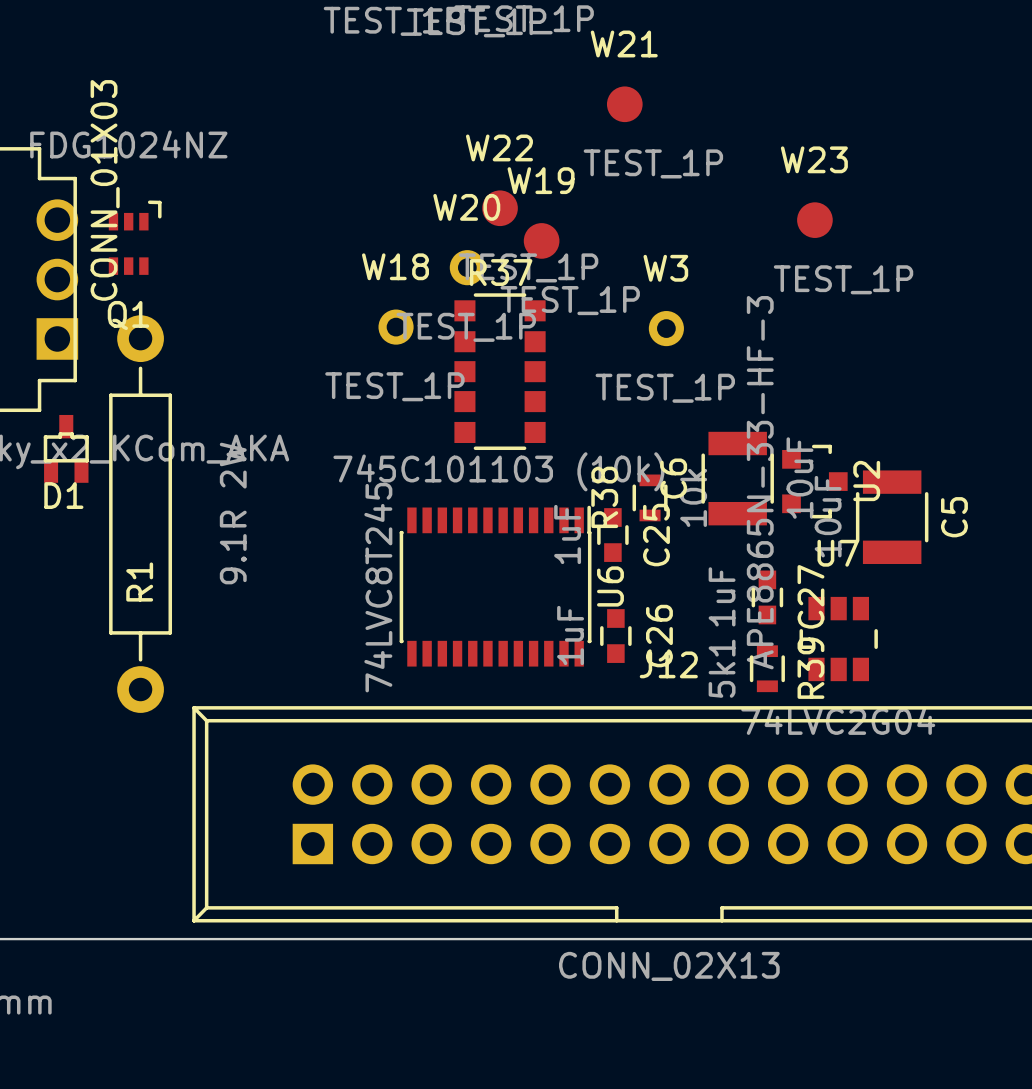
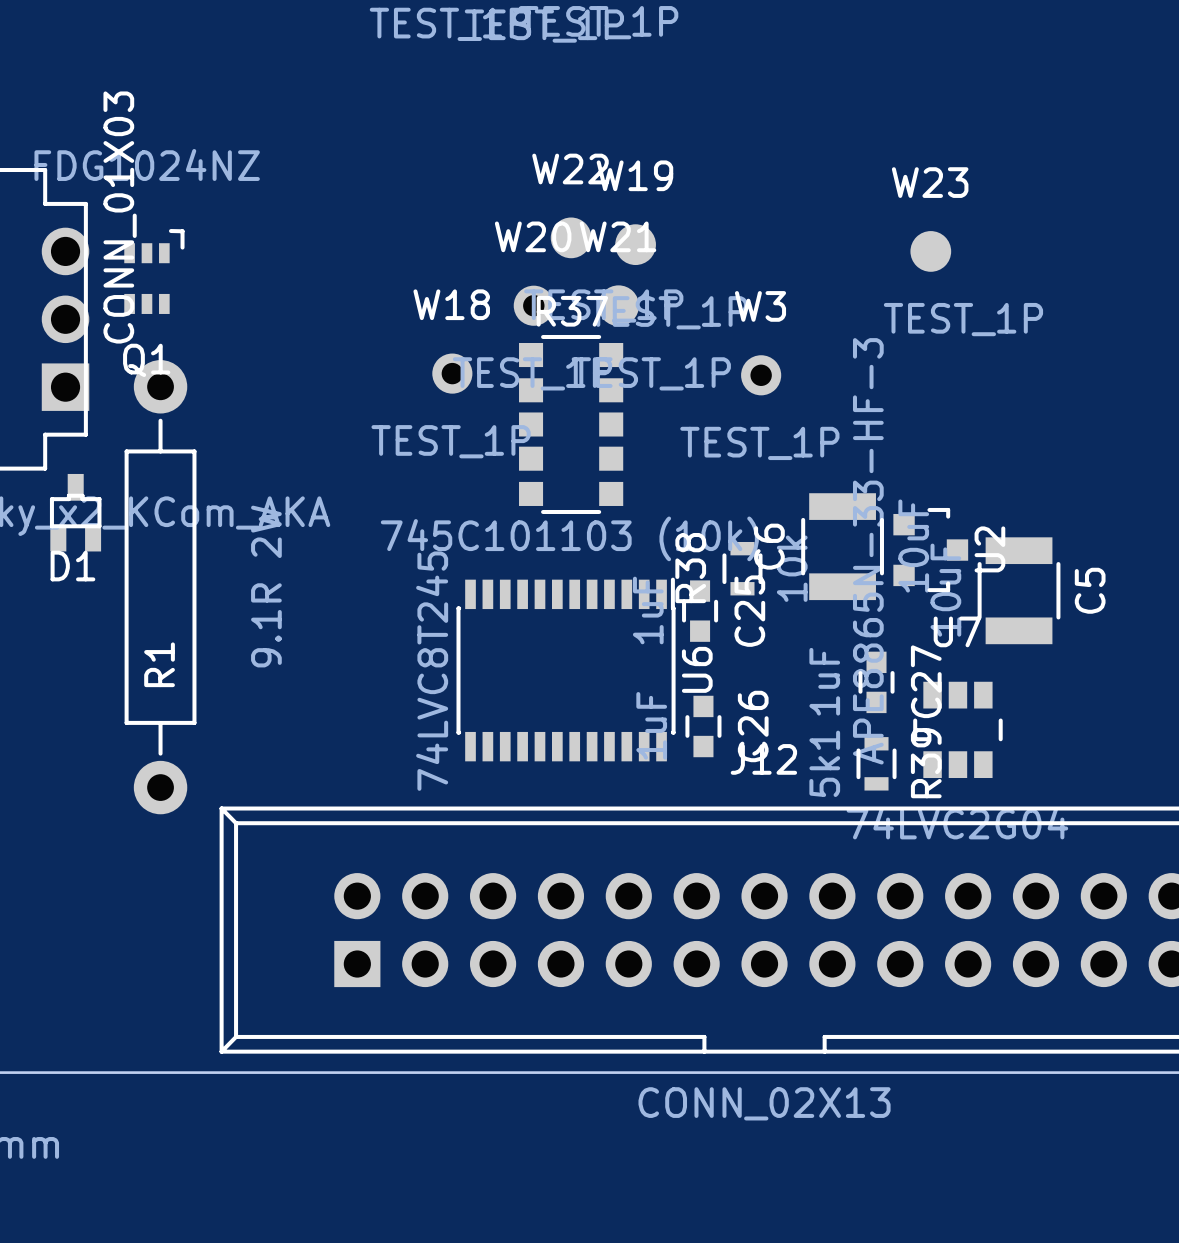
W21 position: (624, 104) -> (618, 305)
W19 position: (541, 240) -> (635, 244)

